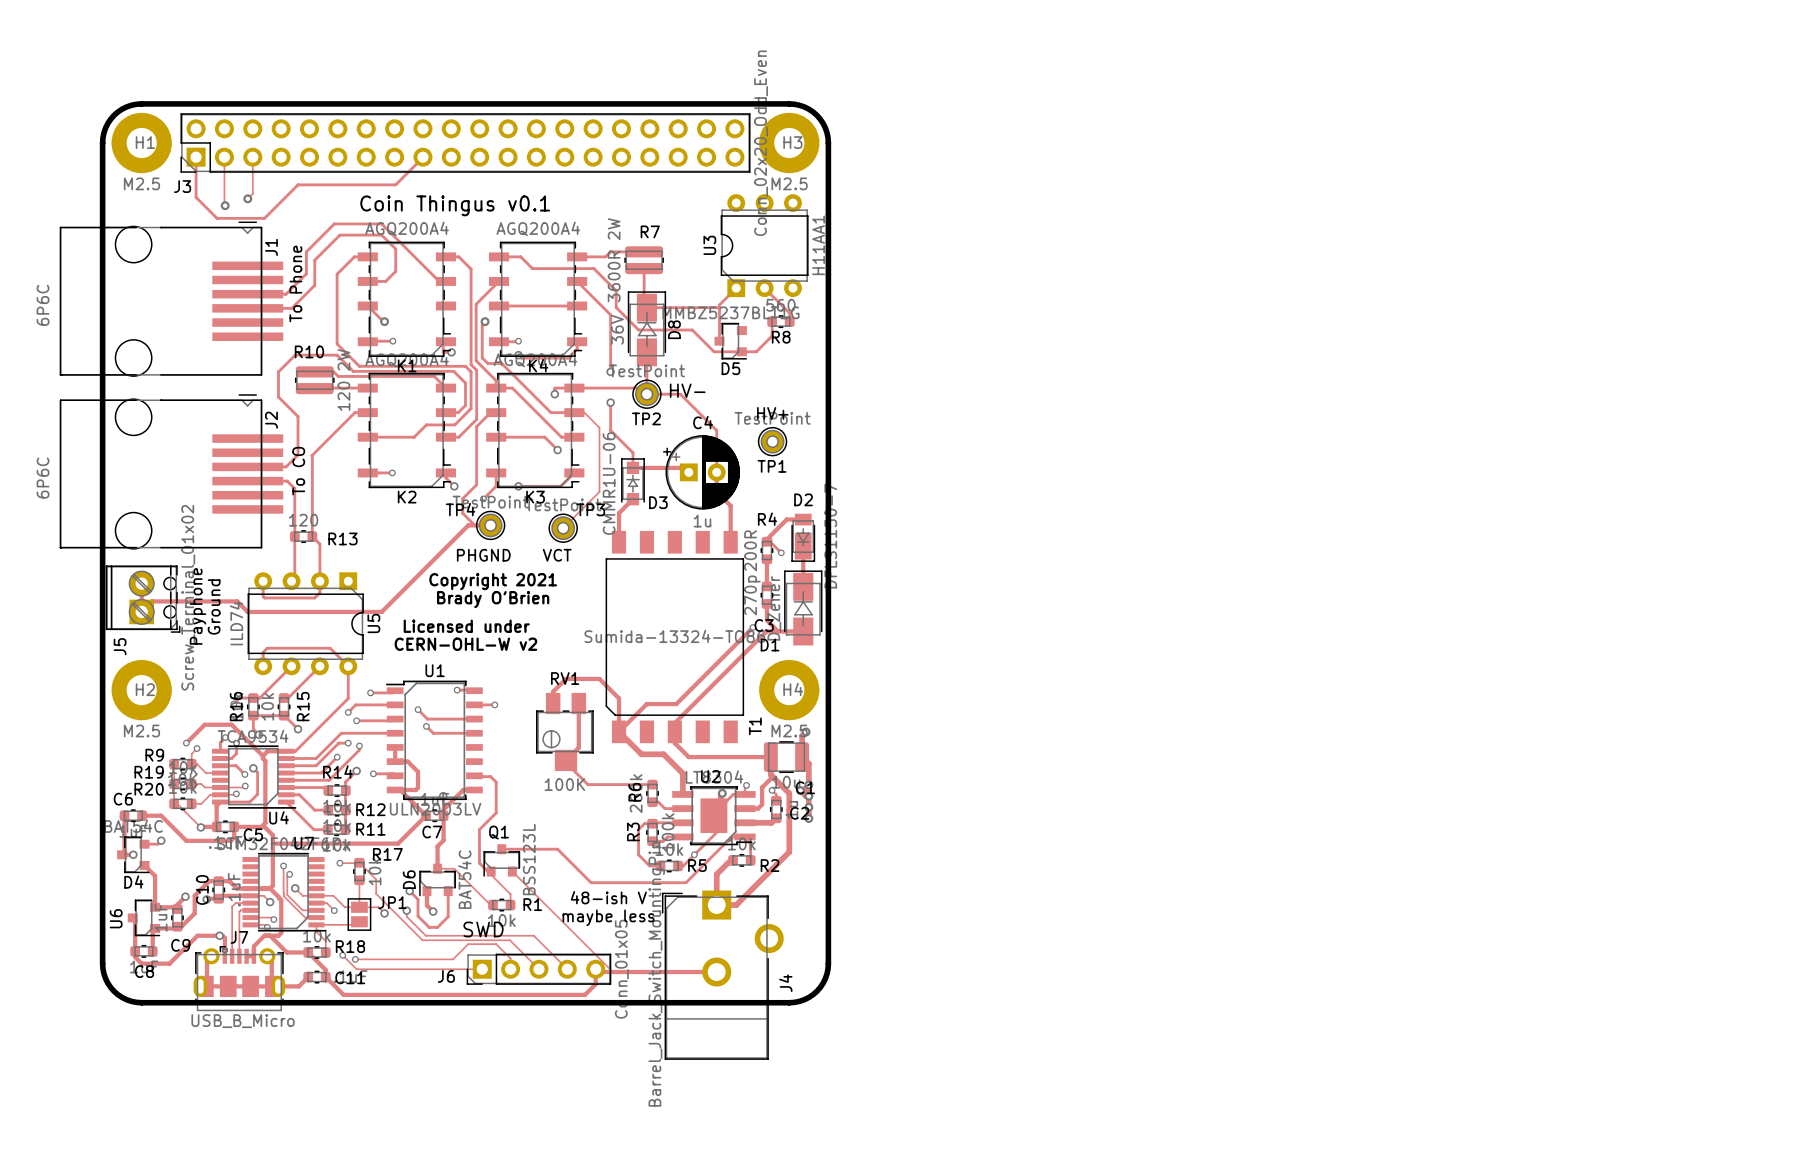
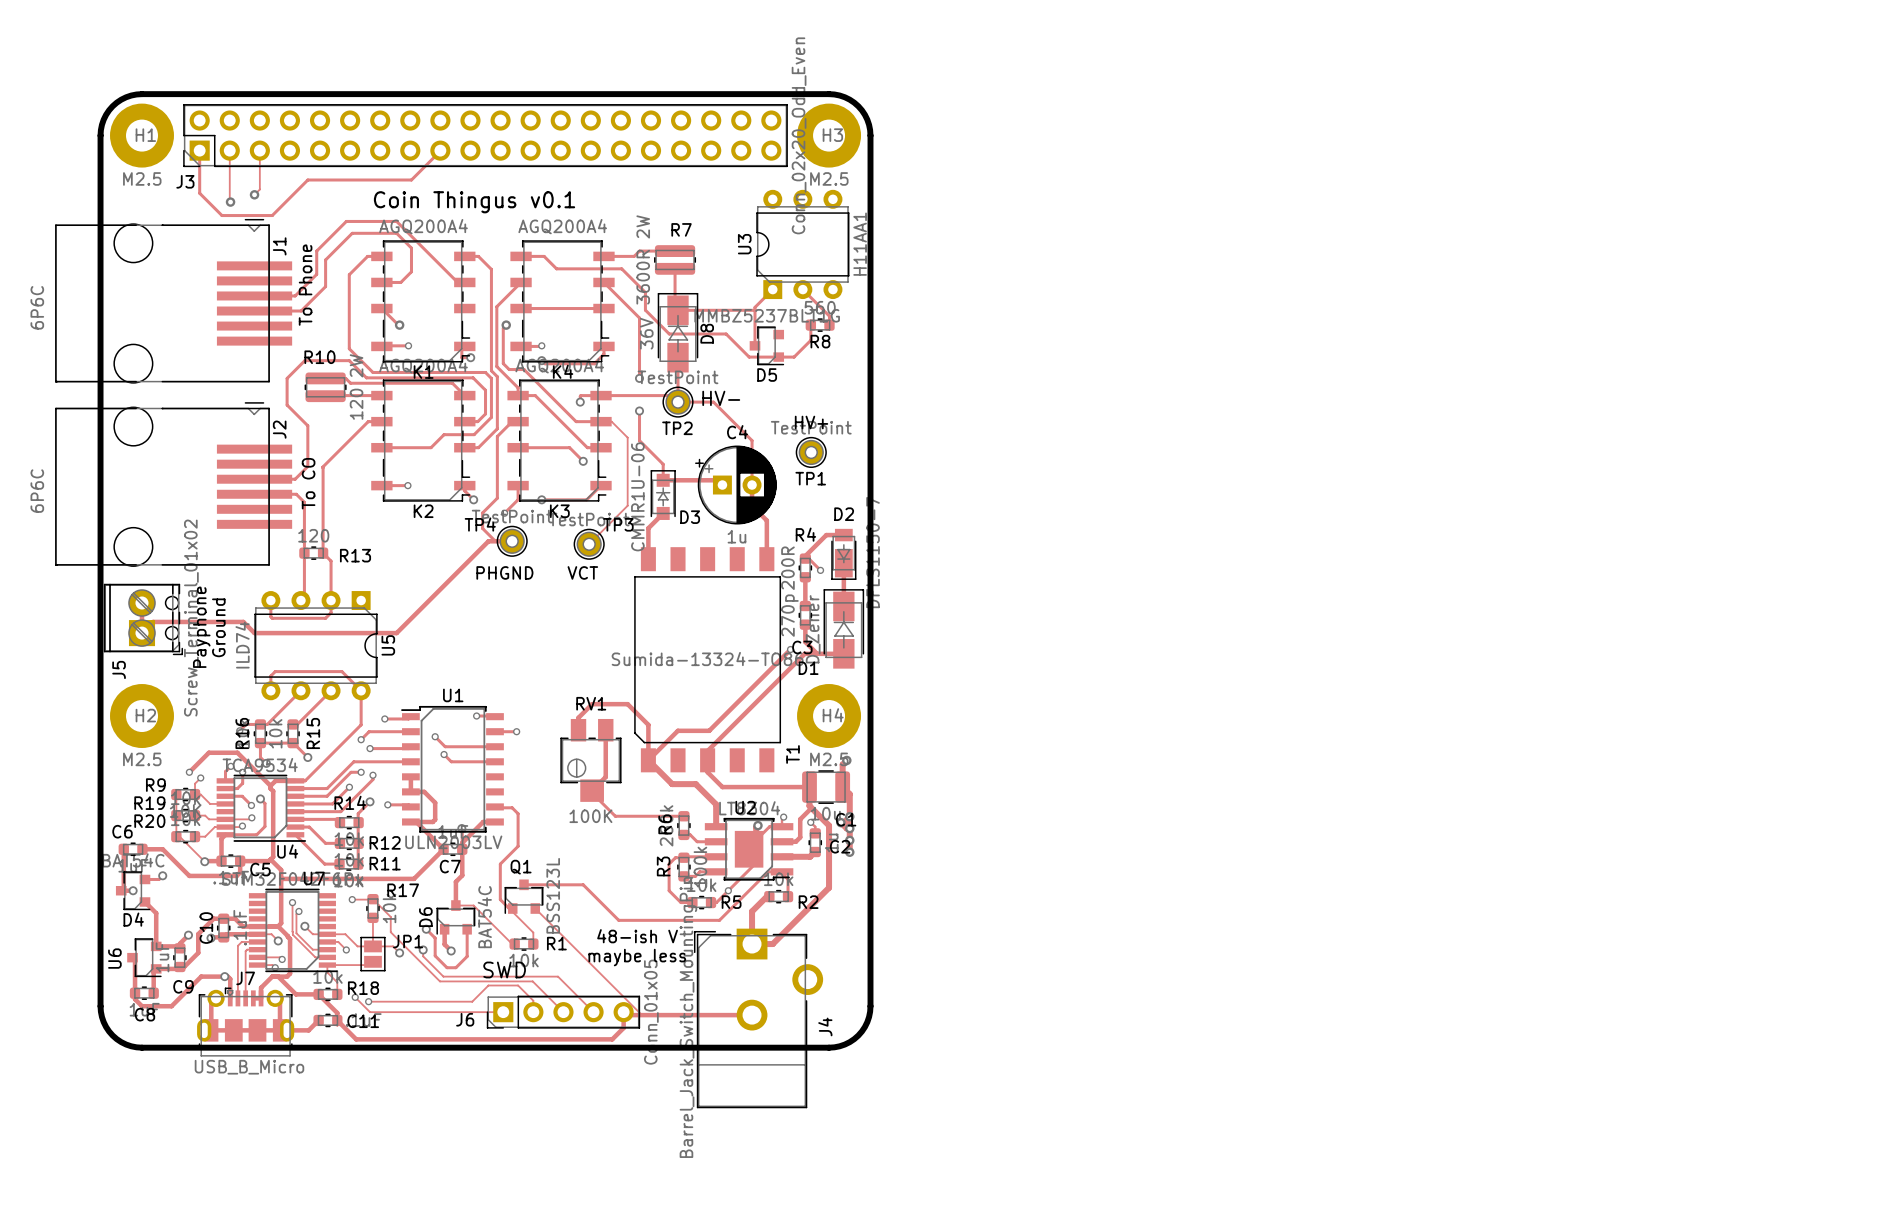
text: Copyright 2021 (493, 581) -> none
text: Brady O'Brien (493, 599) -> none
text: Licensed under (466, 626) -> none
text: CERN-OHL-W v2 (465, 644) -> none

